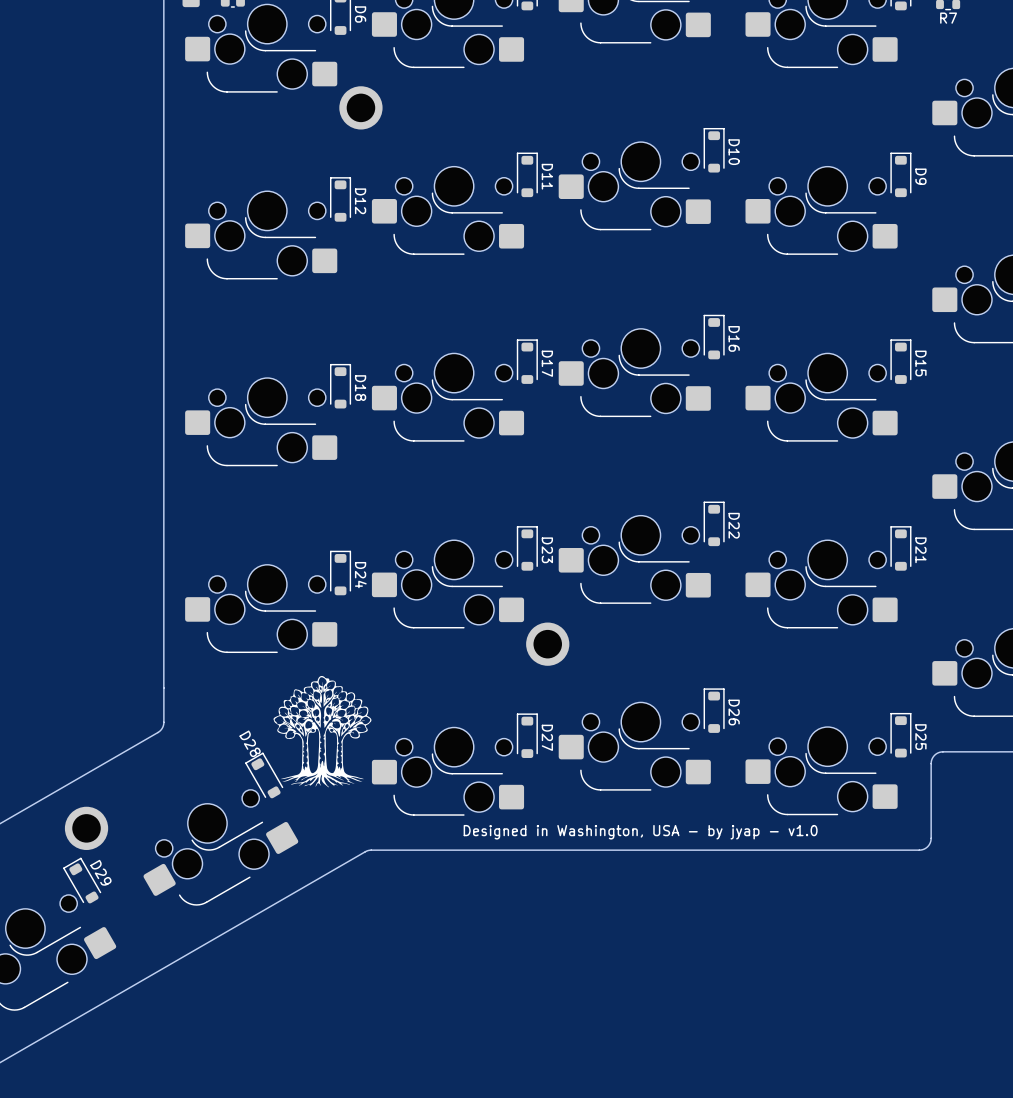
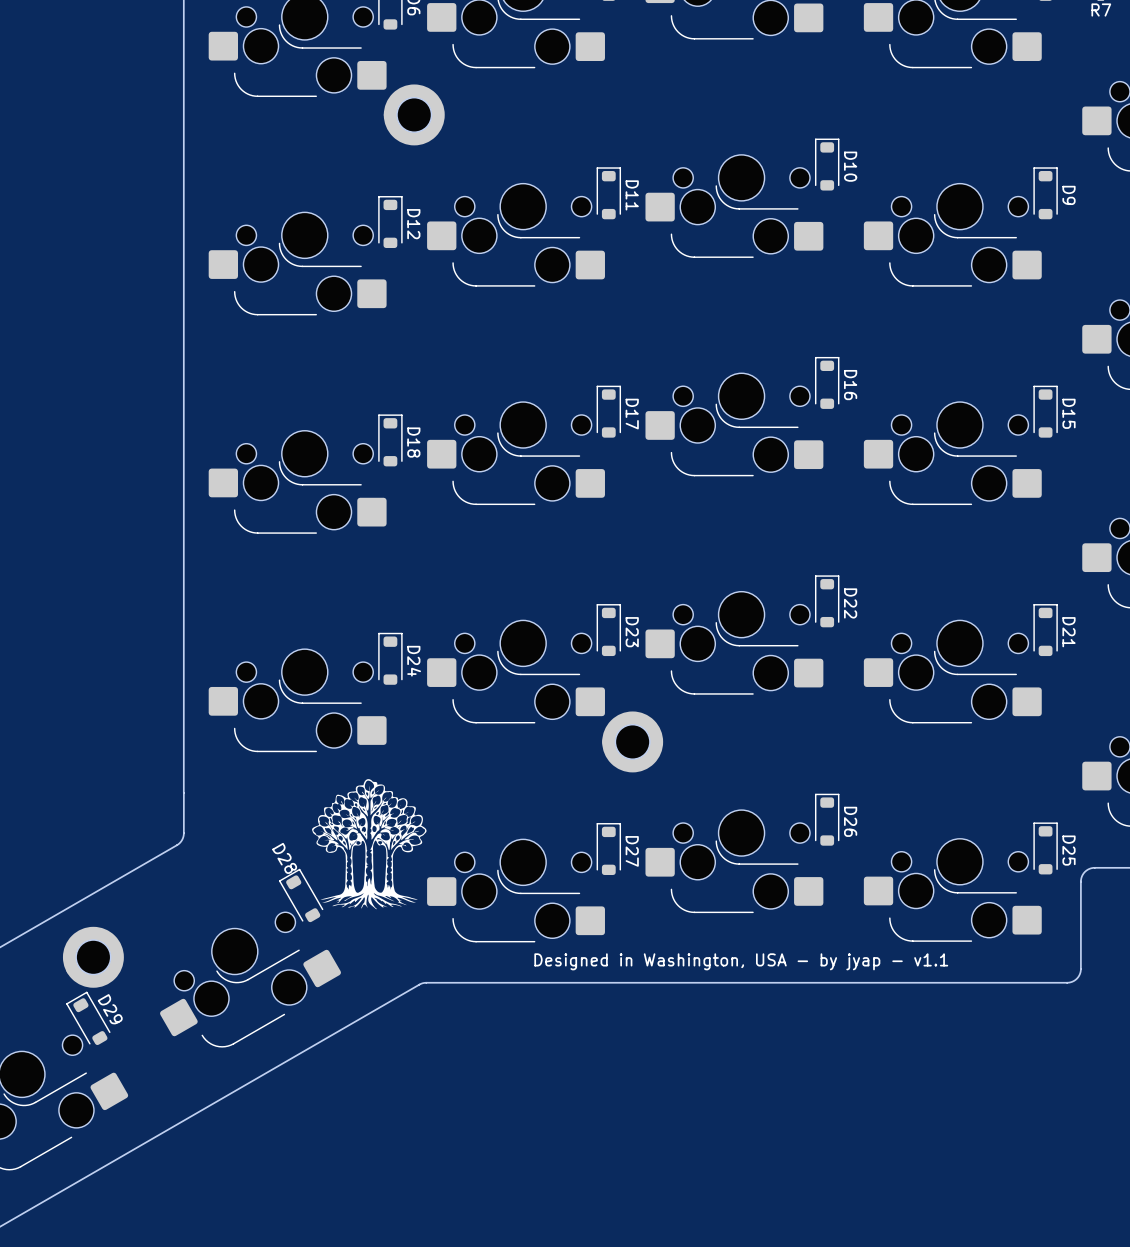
part footprint: [339, 86, 383, 130] -> [383, 84, 445, 146]
part footprint: [526, 622, 570, 666] -> [602, 711, 664, 773]
part footprint: [64, 806, 109, 851] -> [62, 926, 124, 988]
text: Designed in Washington, USA - by jyap - v1.0 (640, 832) -> Designed in Washington, USA - by jyap - v1.1 (741, 961)

